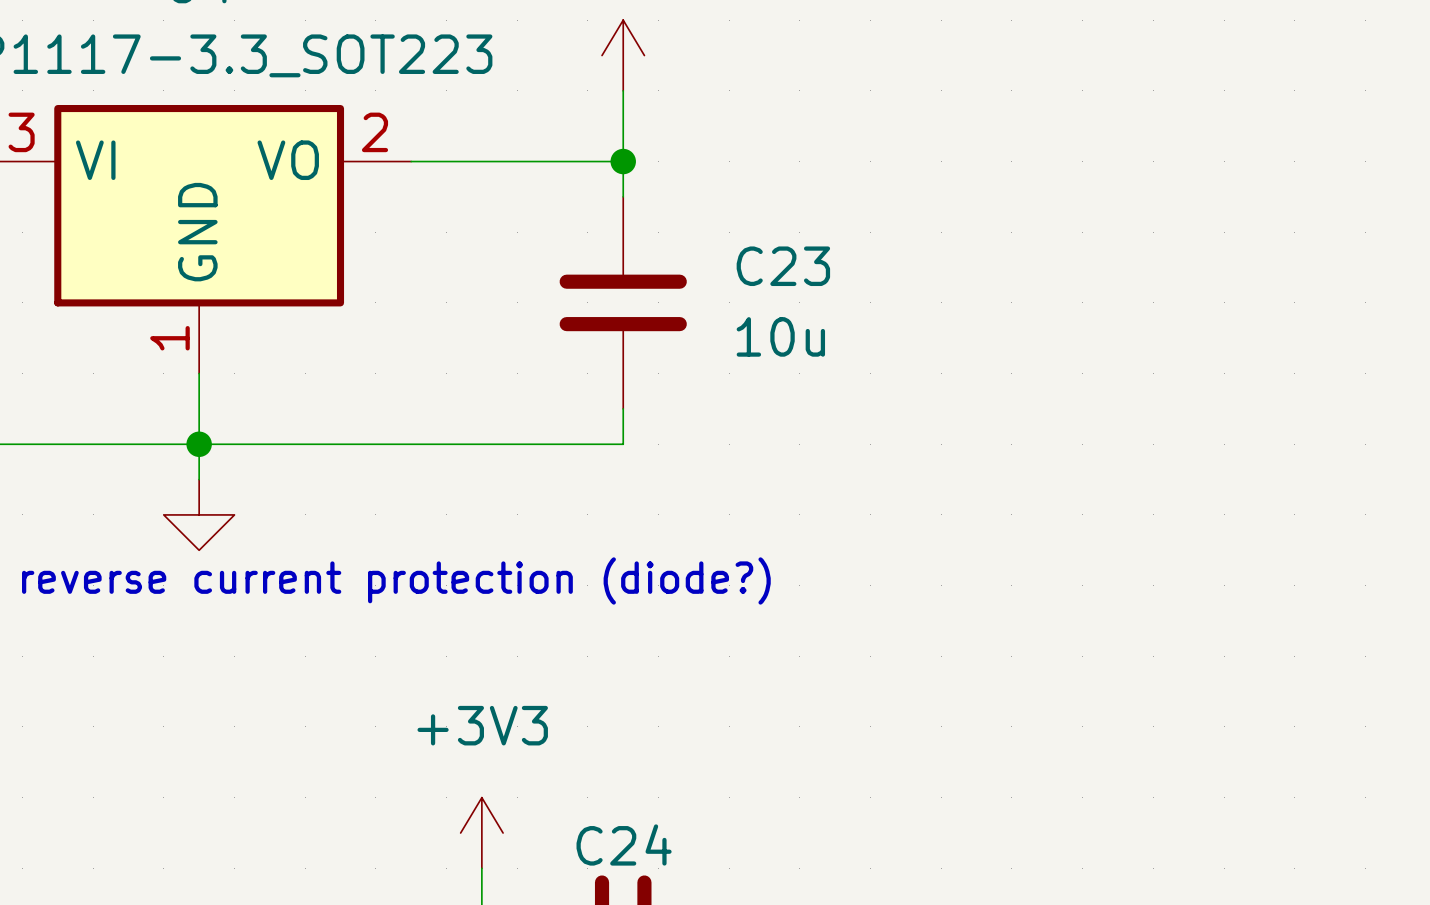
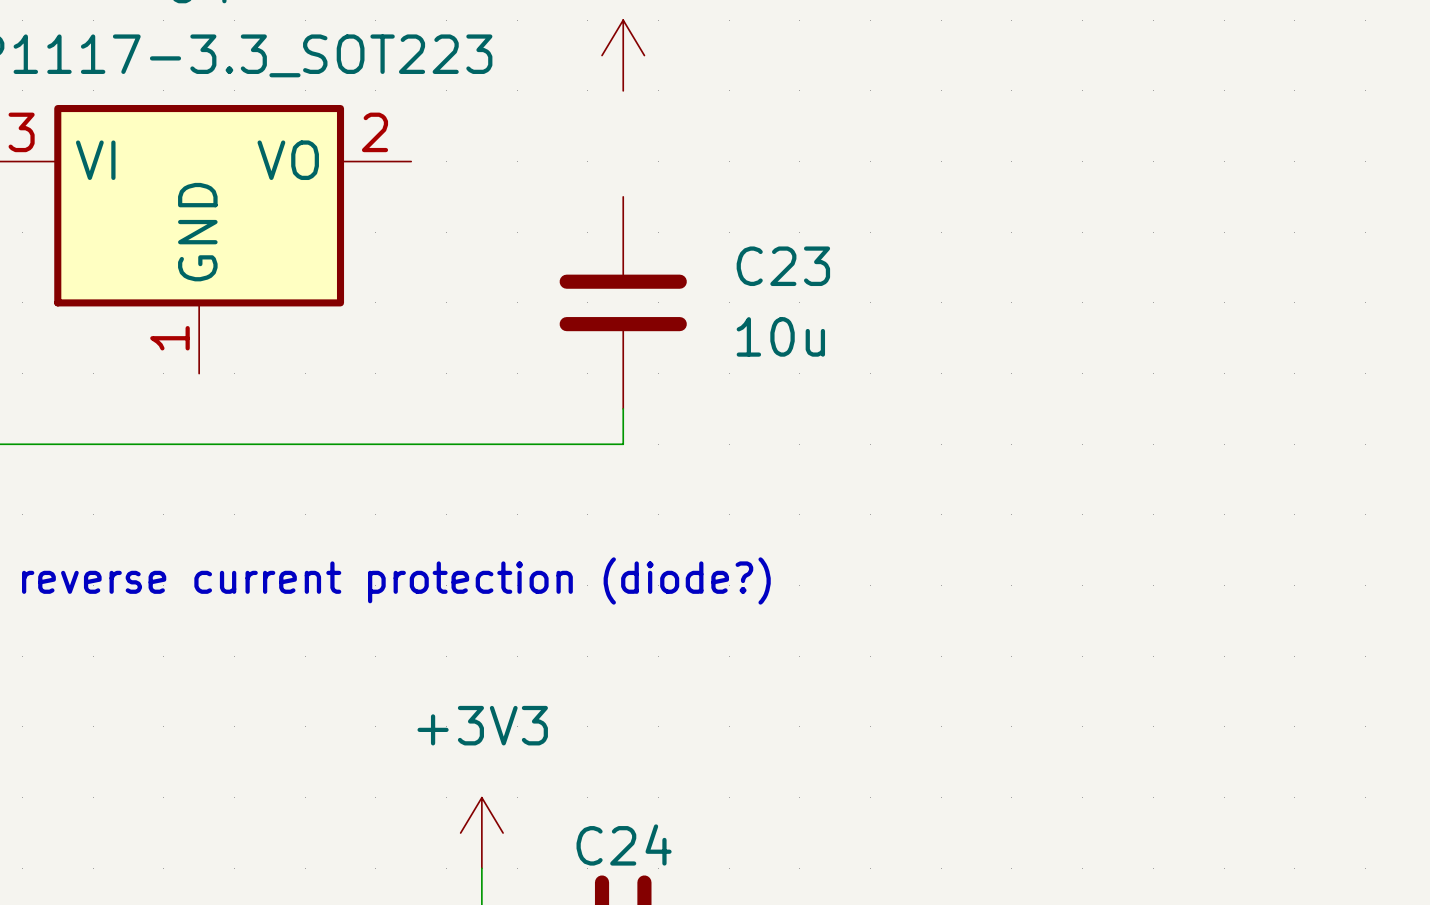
wire: (623, 90) (623, 196) -> none
wire: (411, 161) (623, 161) -> none
junction: (623, 161) -> none
wire: (199, 373) (199, 479) -> none
junction: (199, 444) -> none
power symbol: (199, 514) -> none

